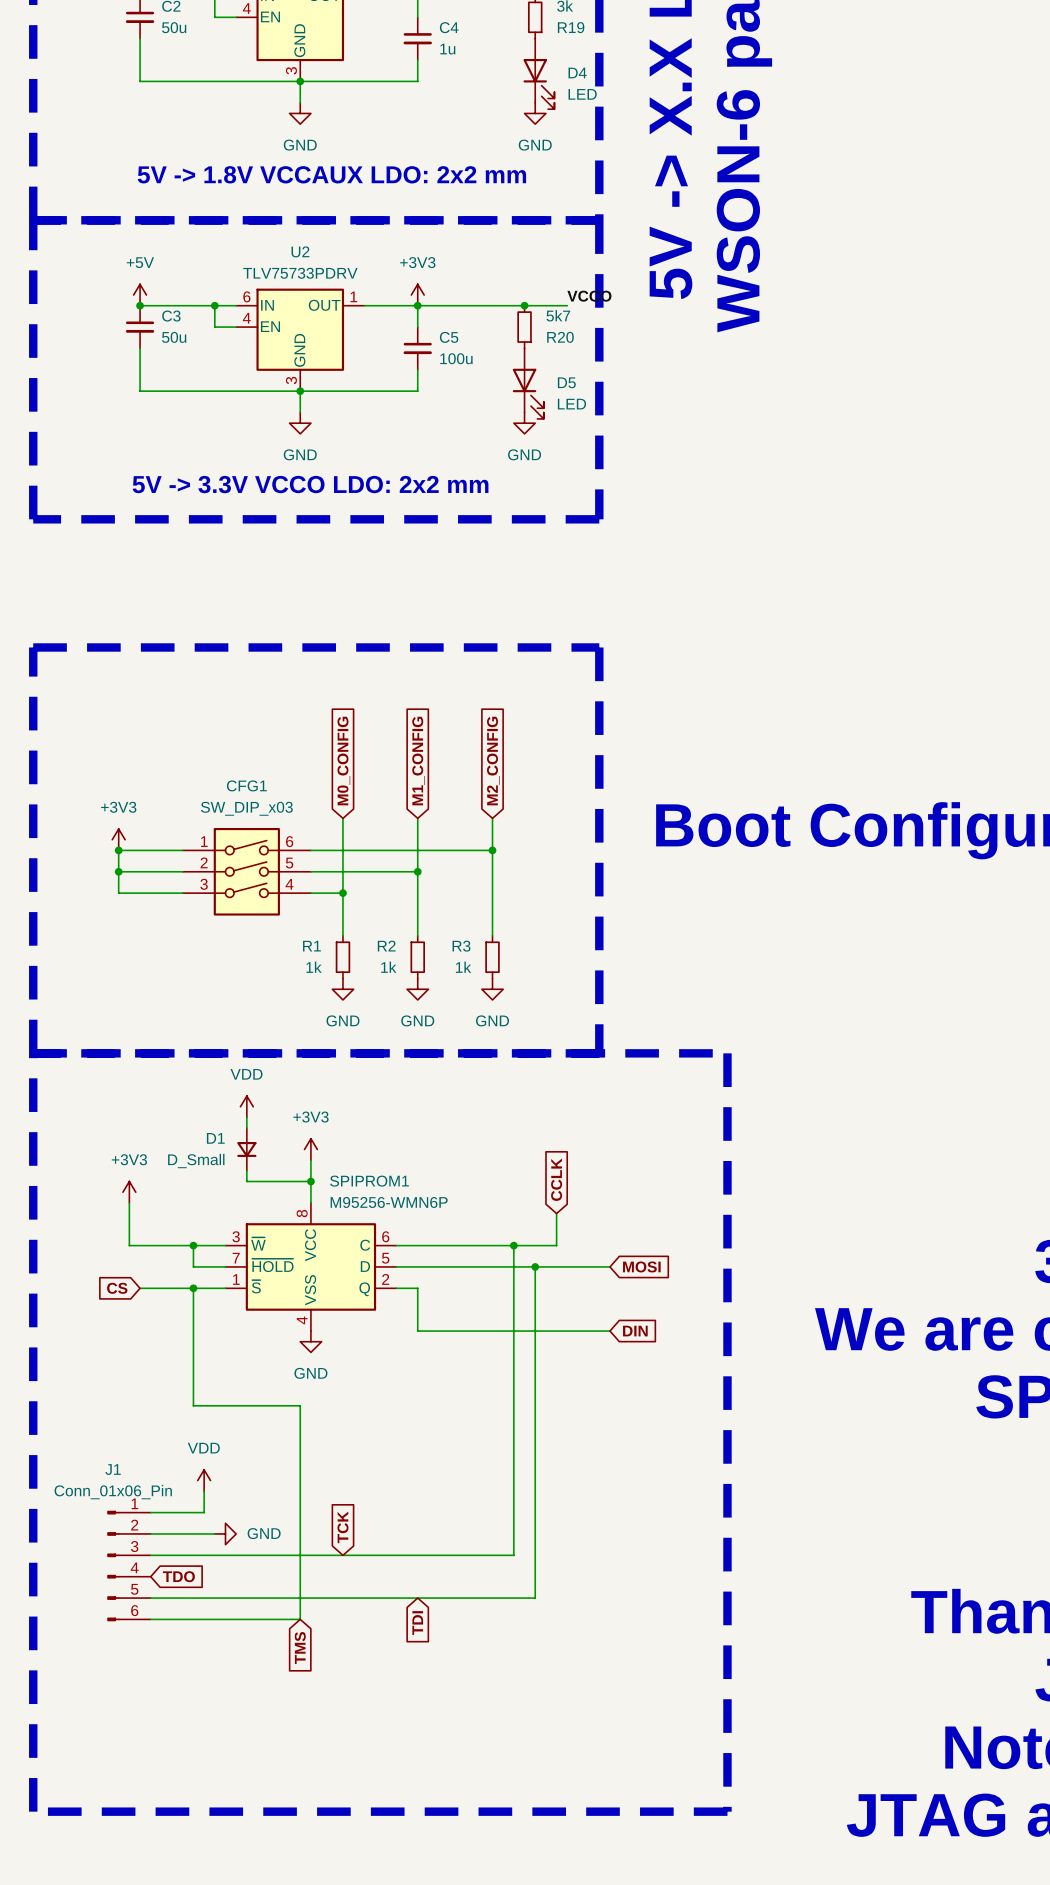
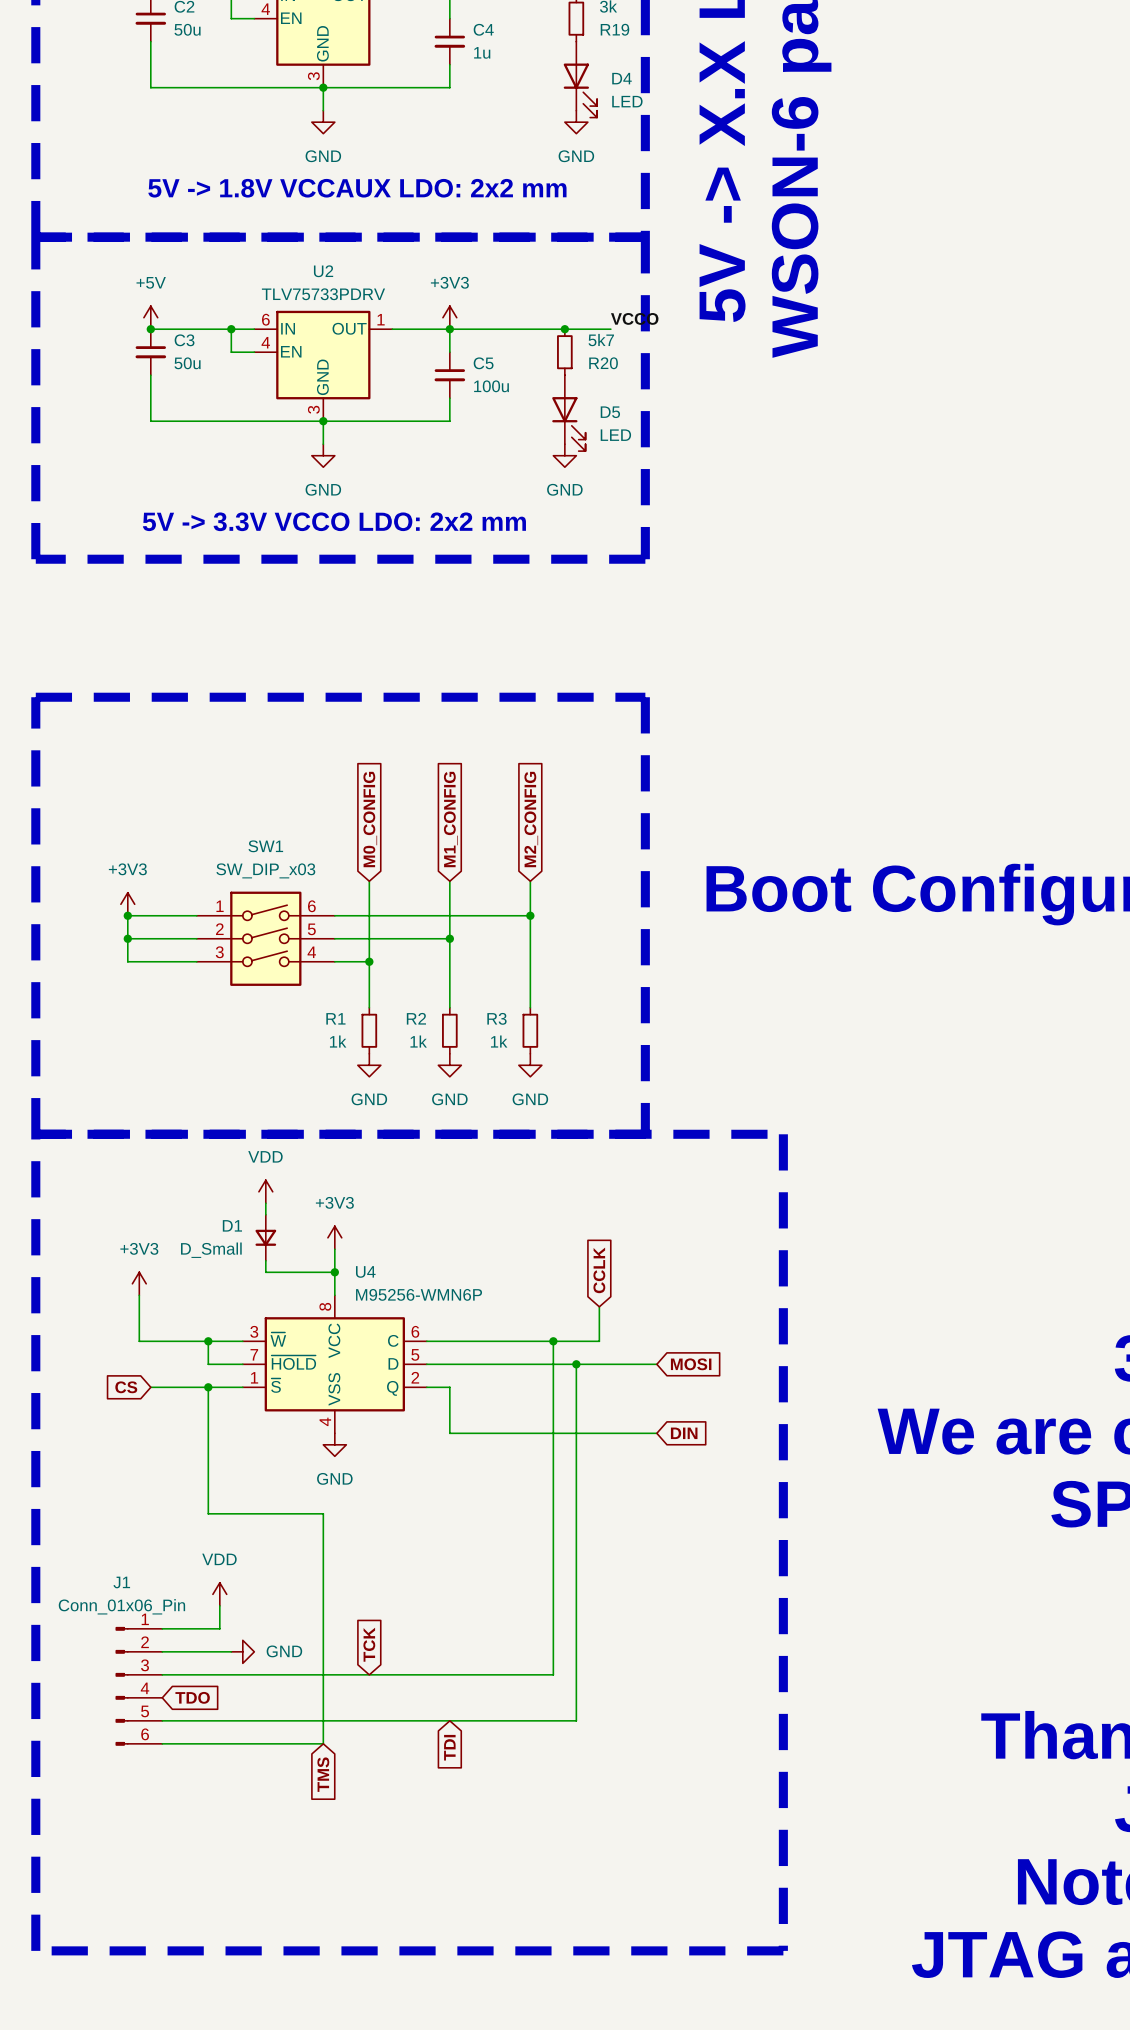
CFG1 name: CFG1 (246, 785) -> SW1 (265, 846)
SPIPROM1 name: SPIPROM1 (369, 1181) -> U4 (365, 1271)

